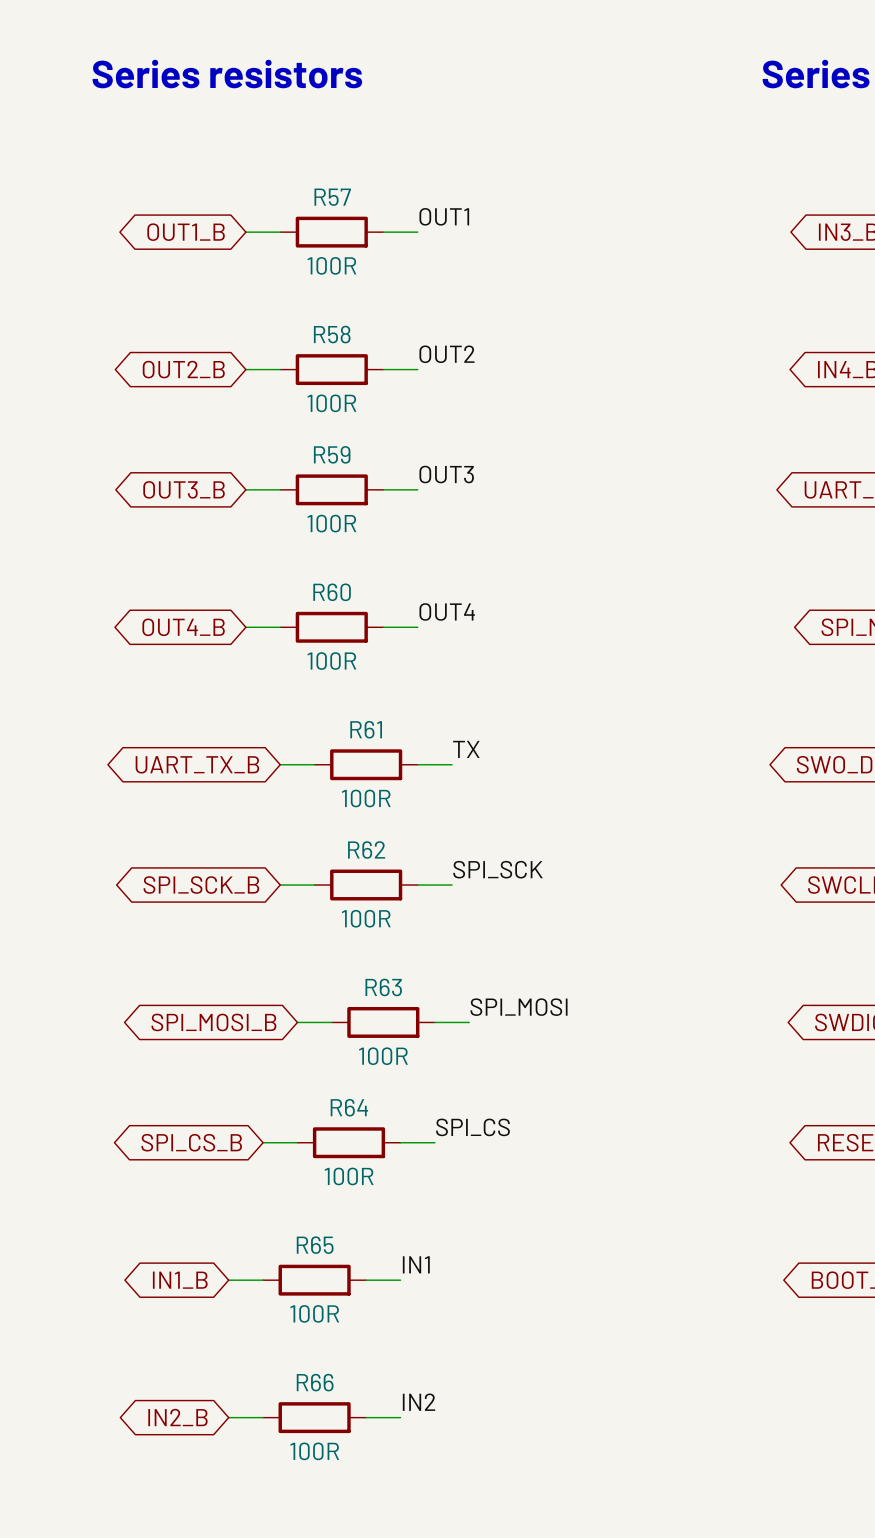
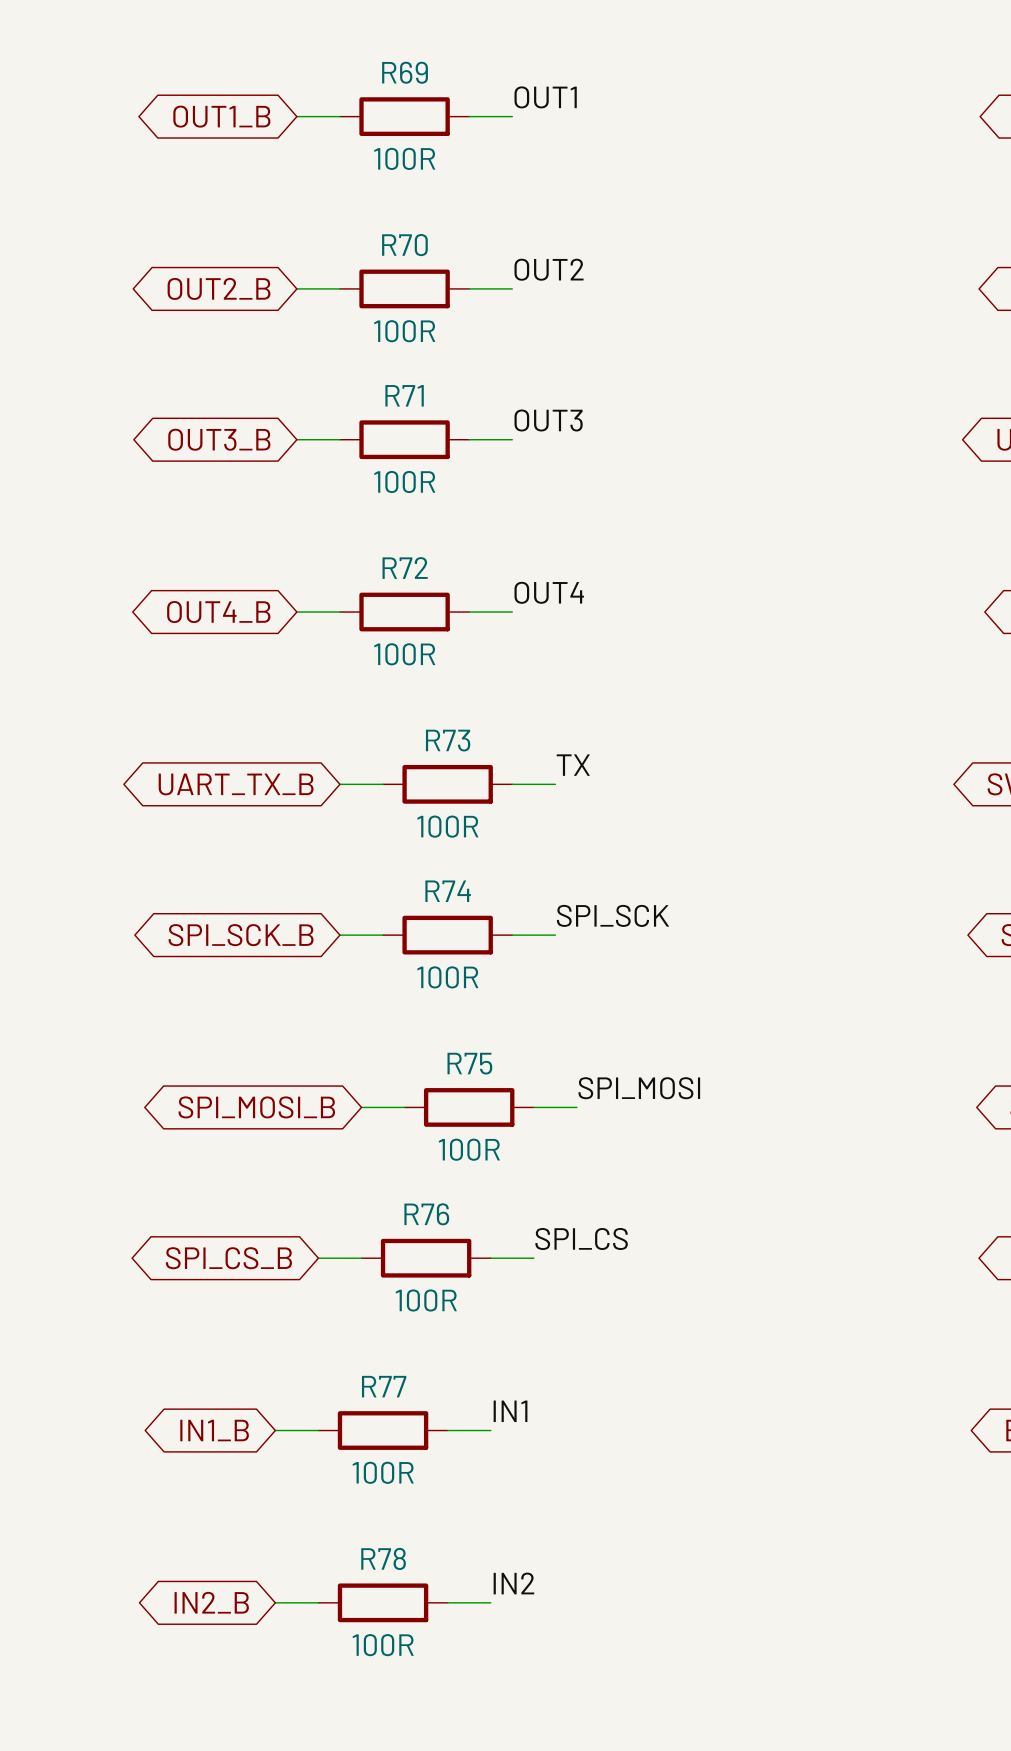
R57 name: R57 (332, 197) -> R69 (405, 72)
R58 name: R58 (332, 334) -> R70 (404, 245)
R59 name: R59 (332, 454) -> R71 (404, 395)
R60 name: R60 (332, 592) -> R72 (405, 568)
R61 name: R61 (366, 729) -> R73 (448, 740)
R62 name: R62 (366, 850) -> R74 (448, 891)
R63 name: R63 (383, 987) -> R75 (469, 1063)
R64 name: R64 (349, 1107) -> R76 (426, 1214)
R65 name: R65 (315, 1245) -> R77 (384, 1386)
R66 name: R66 (315, 1382) -> R78 (383, 1558)

